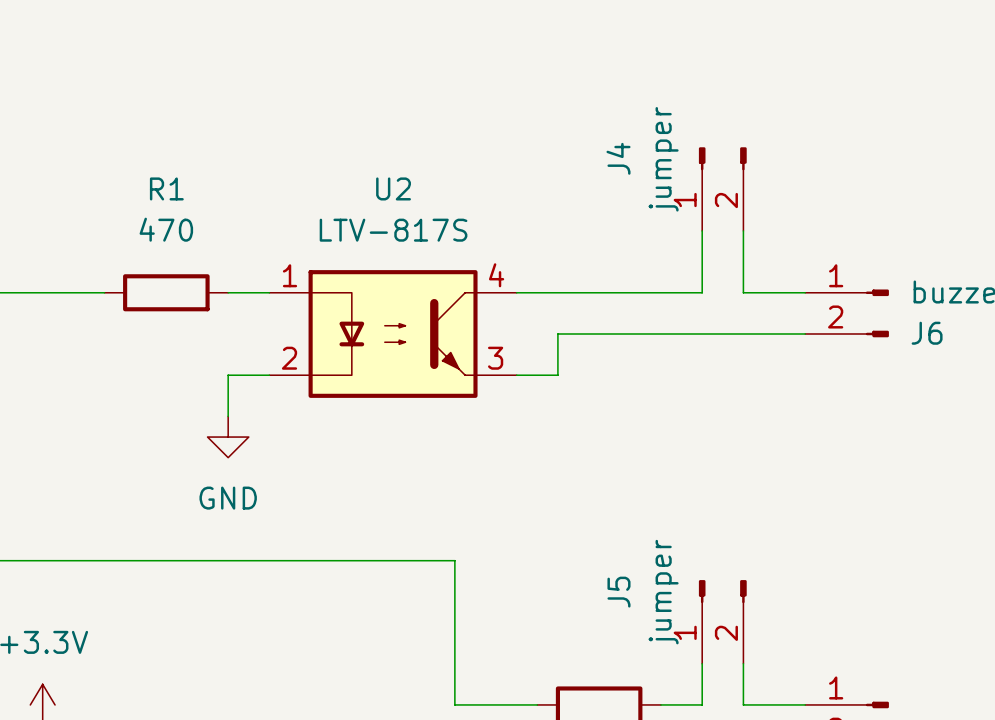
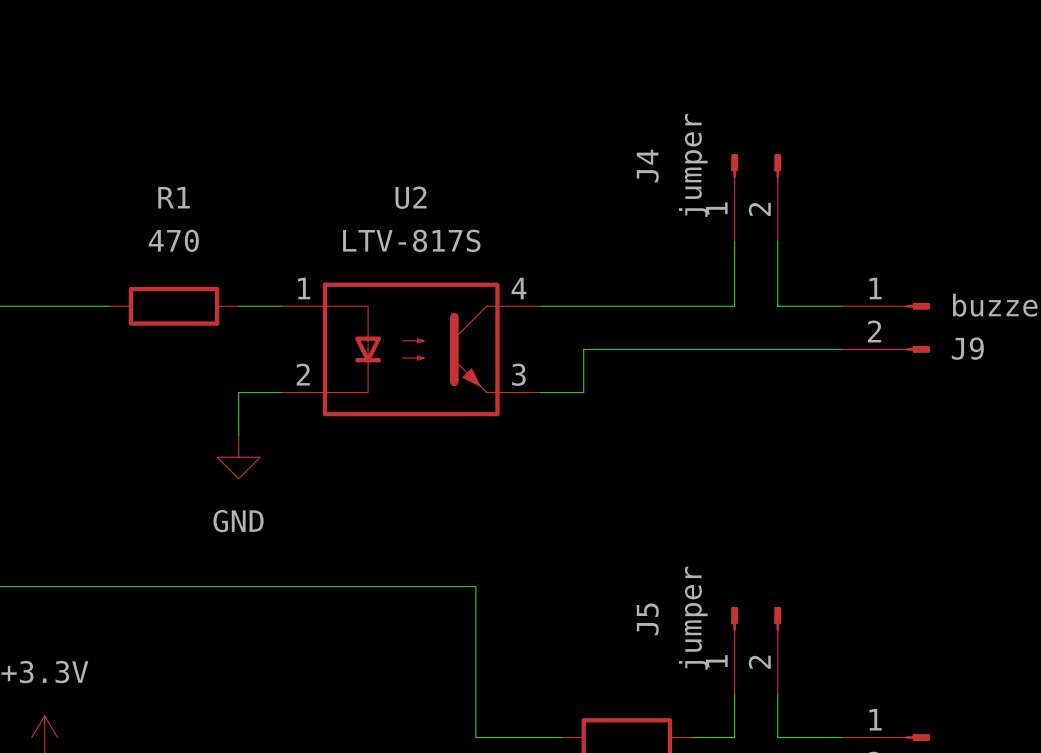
J6 name: J6 (927, 333) -> J9 (967, 348)

